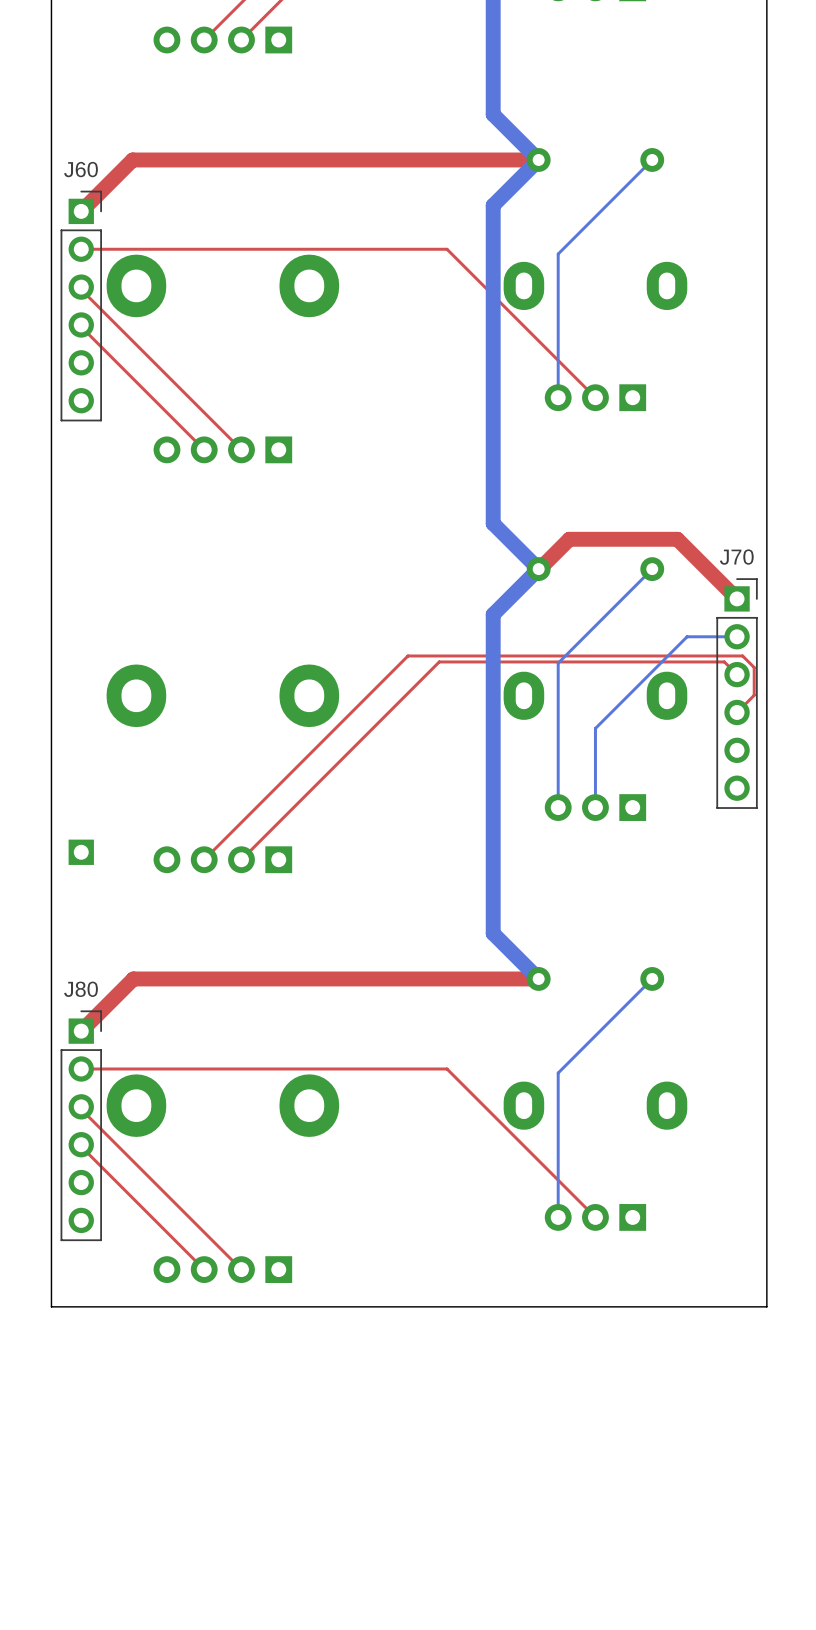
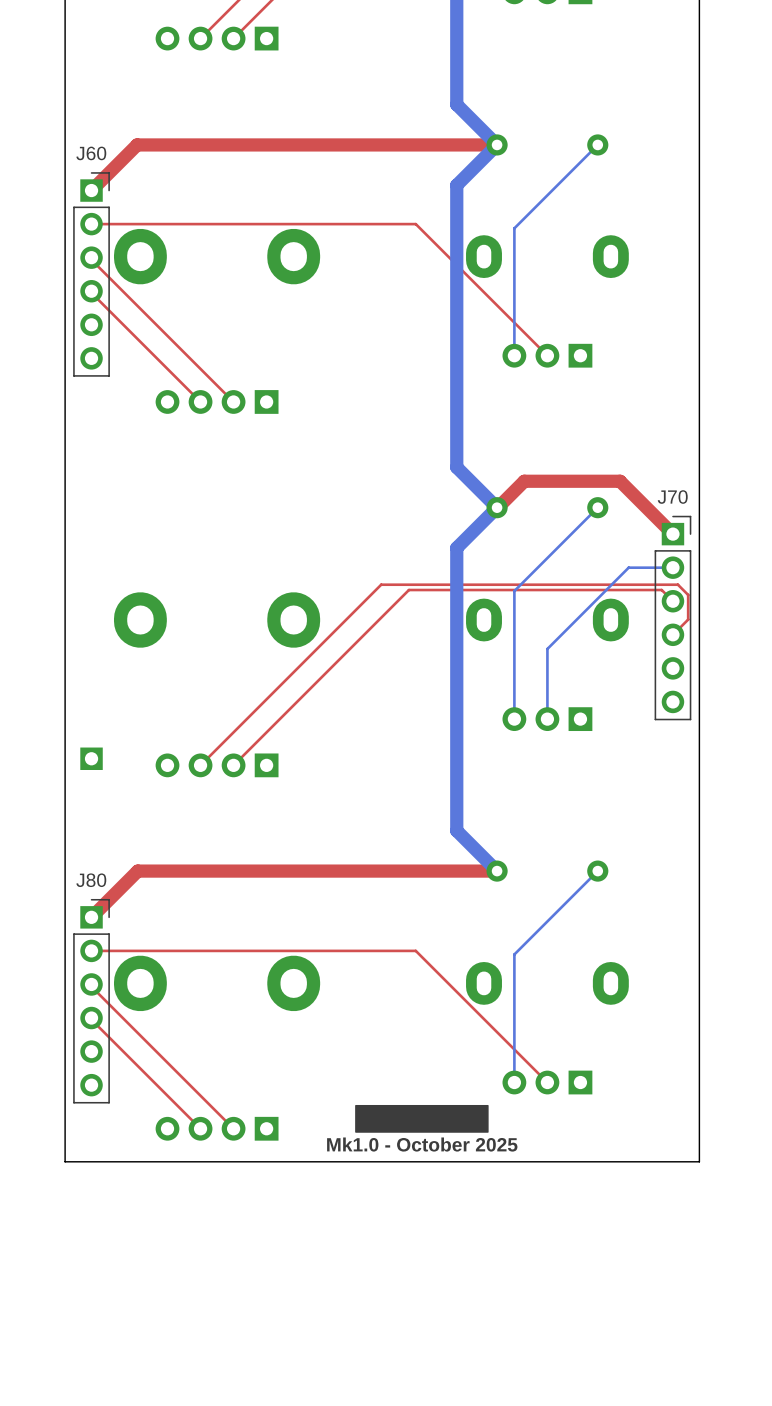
drawing: none -> [355, 1104, 489, 1133]
text: none -> Mk1.0 - October 2025 (422, 1144)

